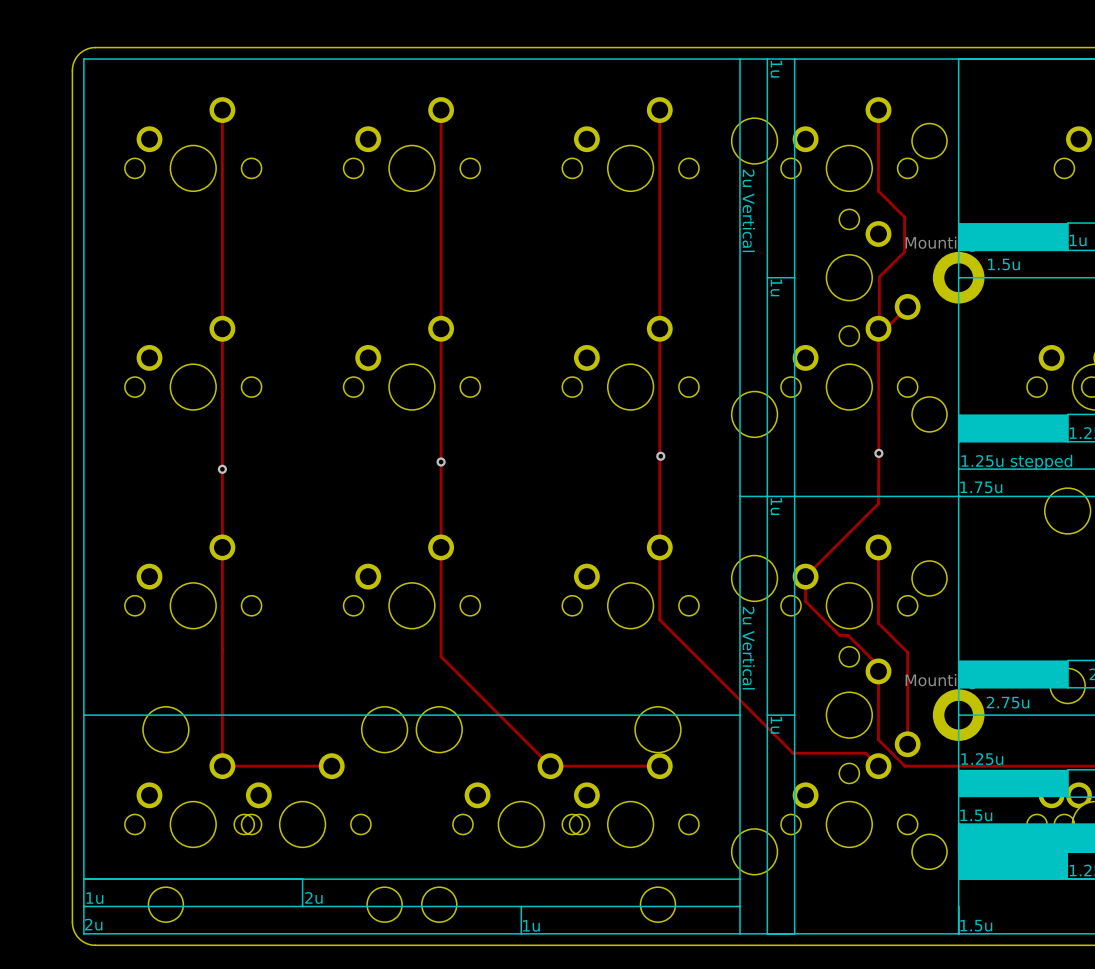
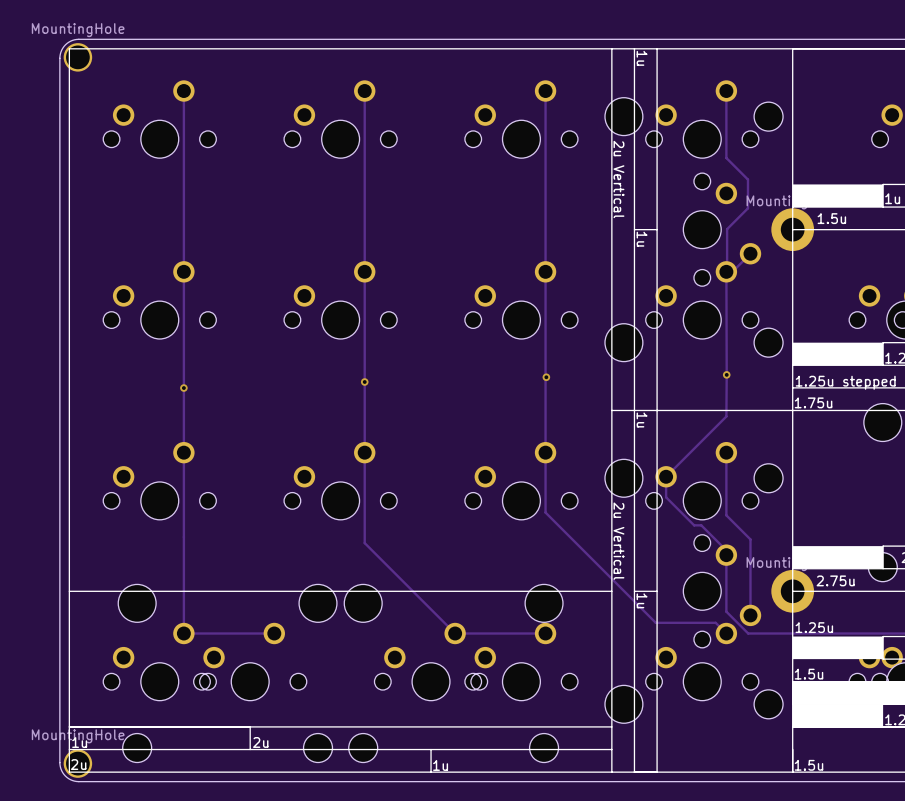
part: none -> MountingHole (77, 57)
part: none -> MountingHole (77, 763)

